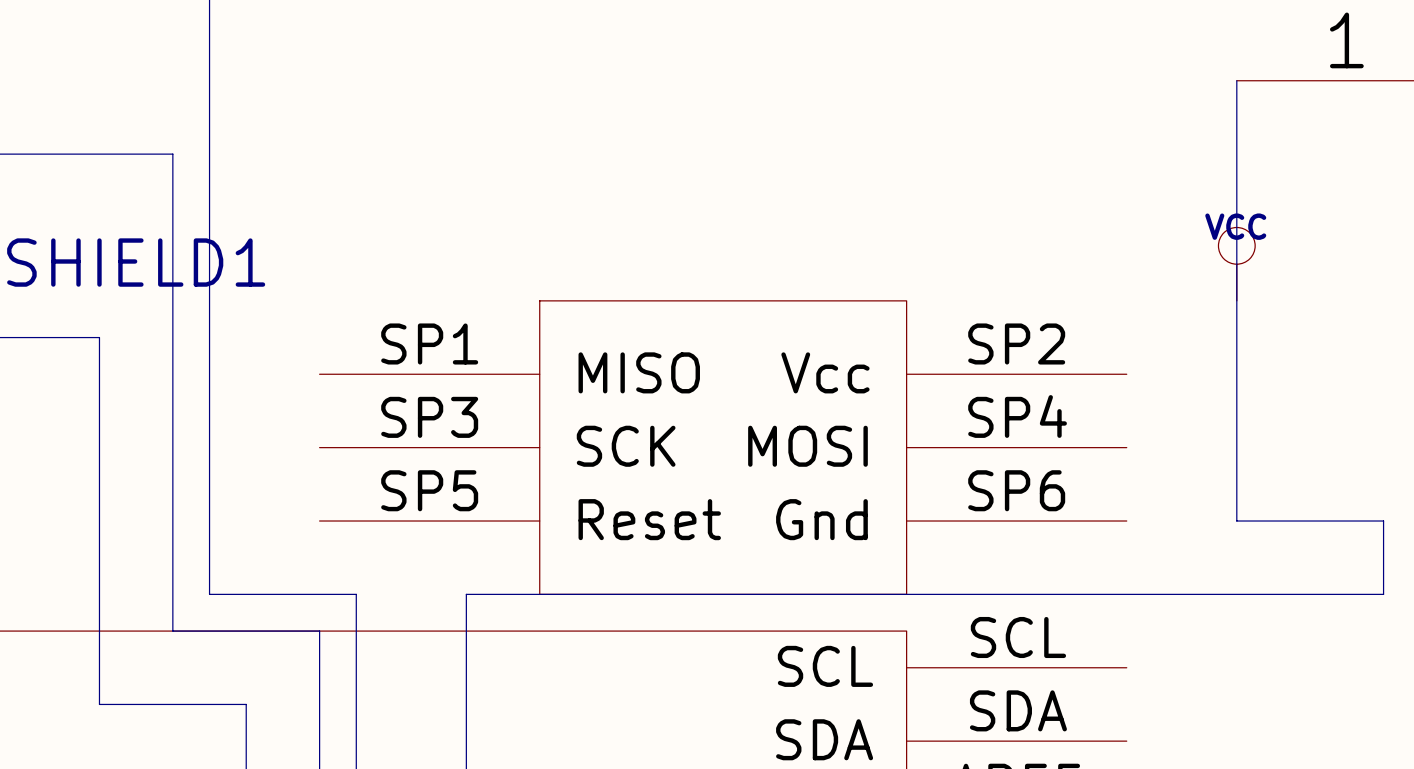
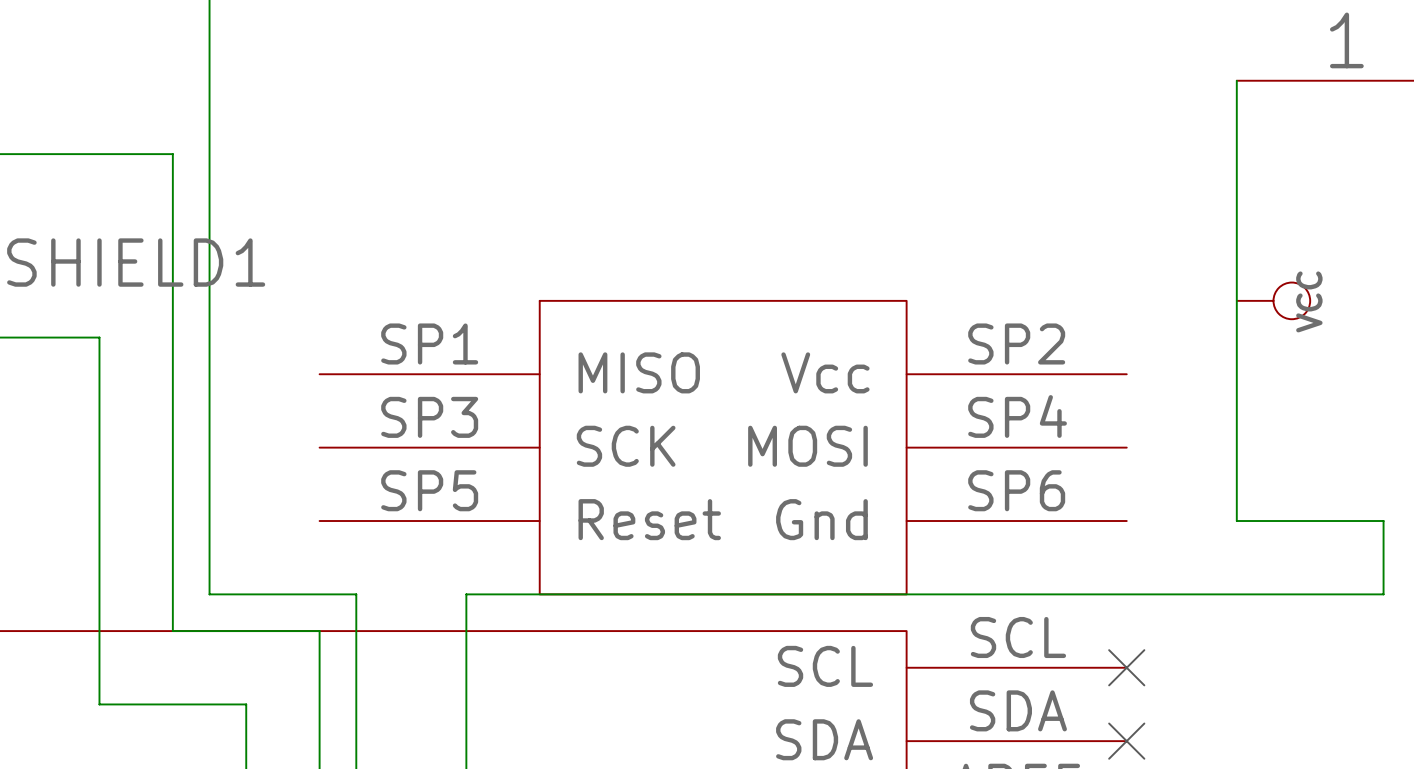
power symbol rotation: 0° (1236, 264) -> 90° clockwise (1273, 300)
power symbol position: VCC (1236, 264) -> VCC (1273, 300)
no-connect mark: none -> (1126, 667)
no-connect mark: none -> (1126, 741)

